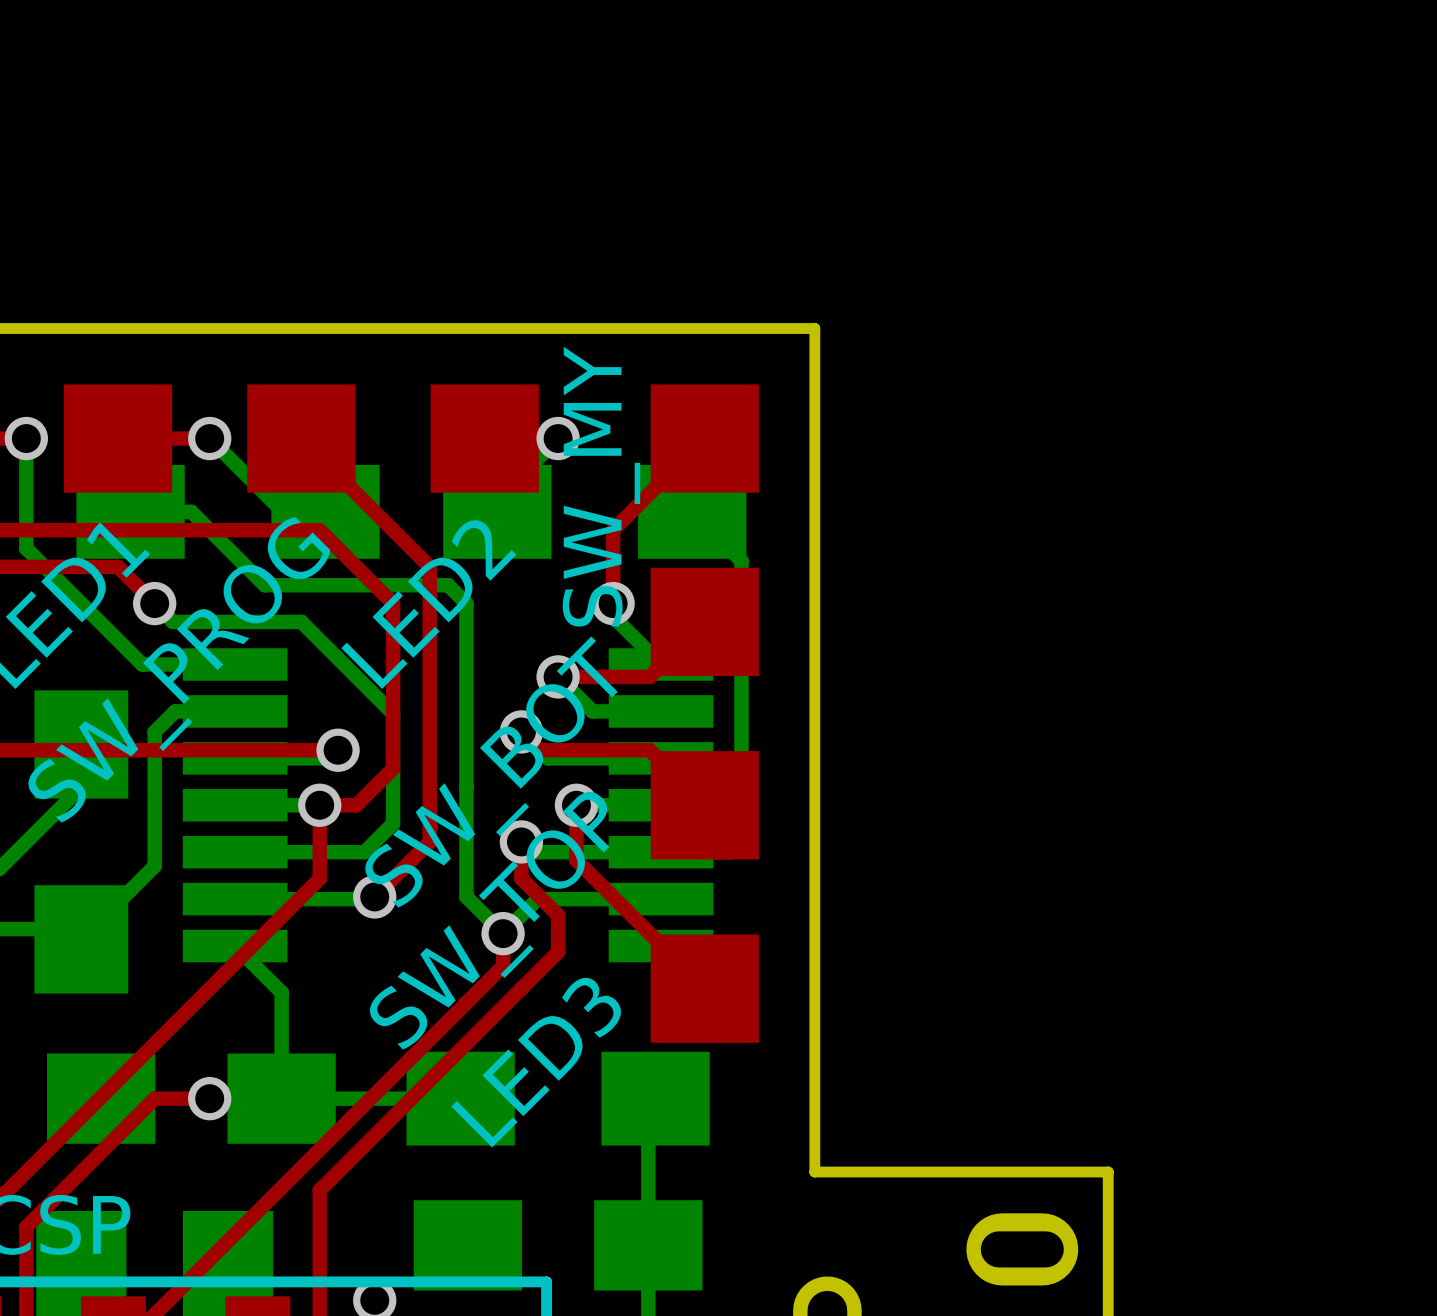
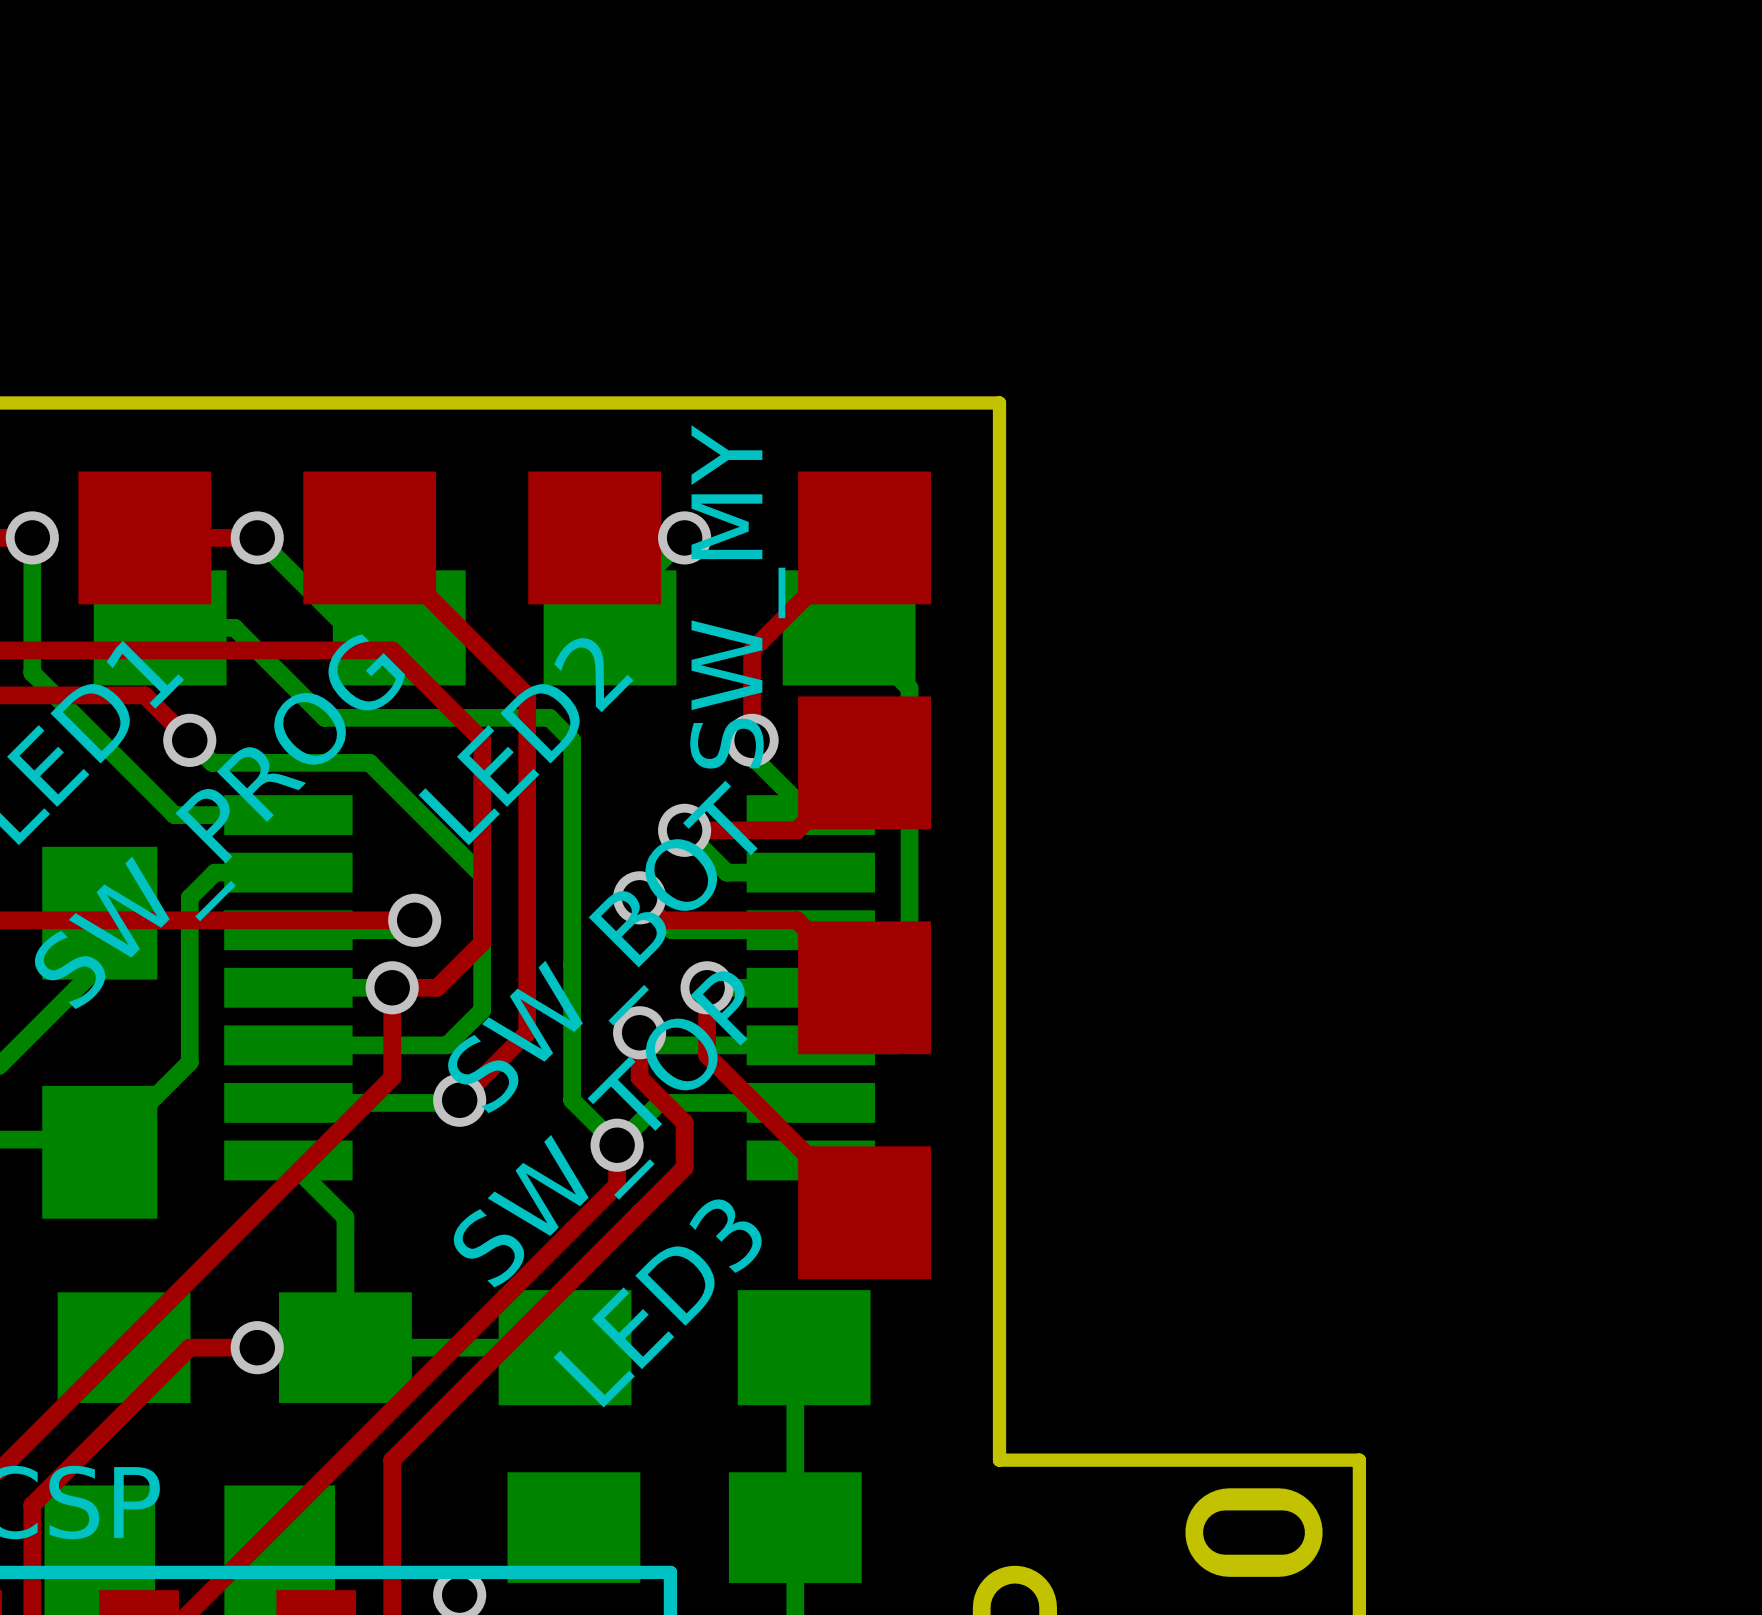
board edge: (814, 1172) (1108, 1172) (1108, 1190) -> (999, 1437) (999, 1460) (1359, 1460)

